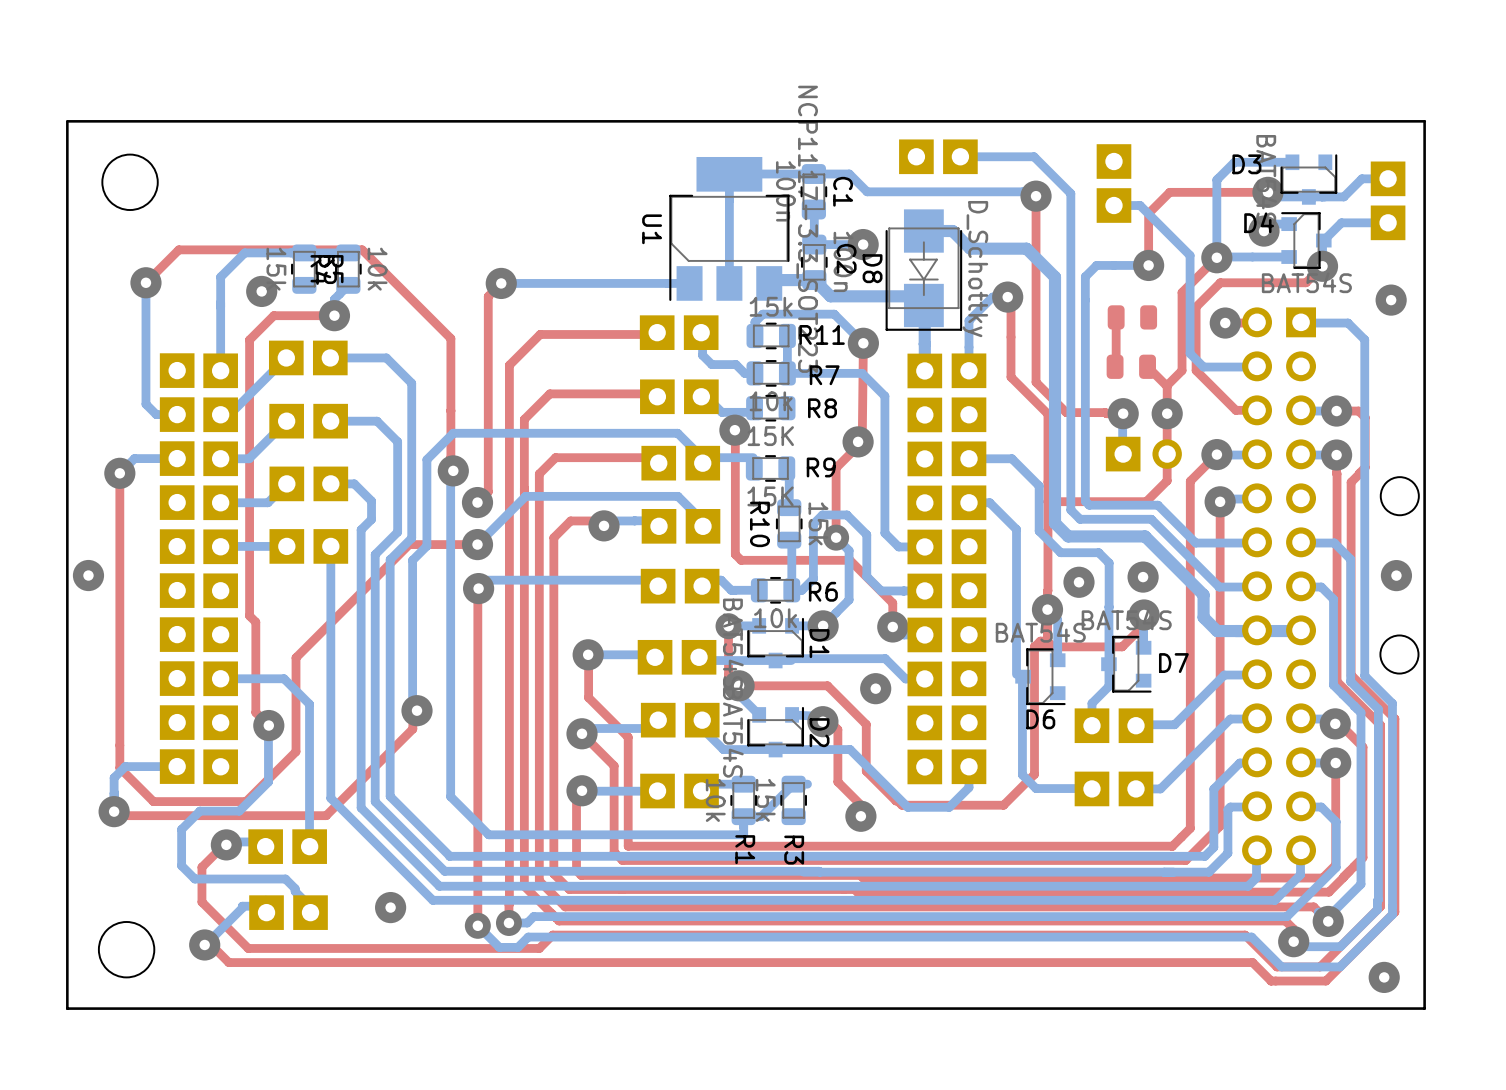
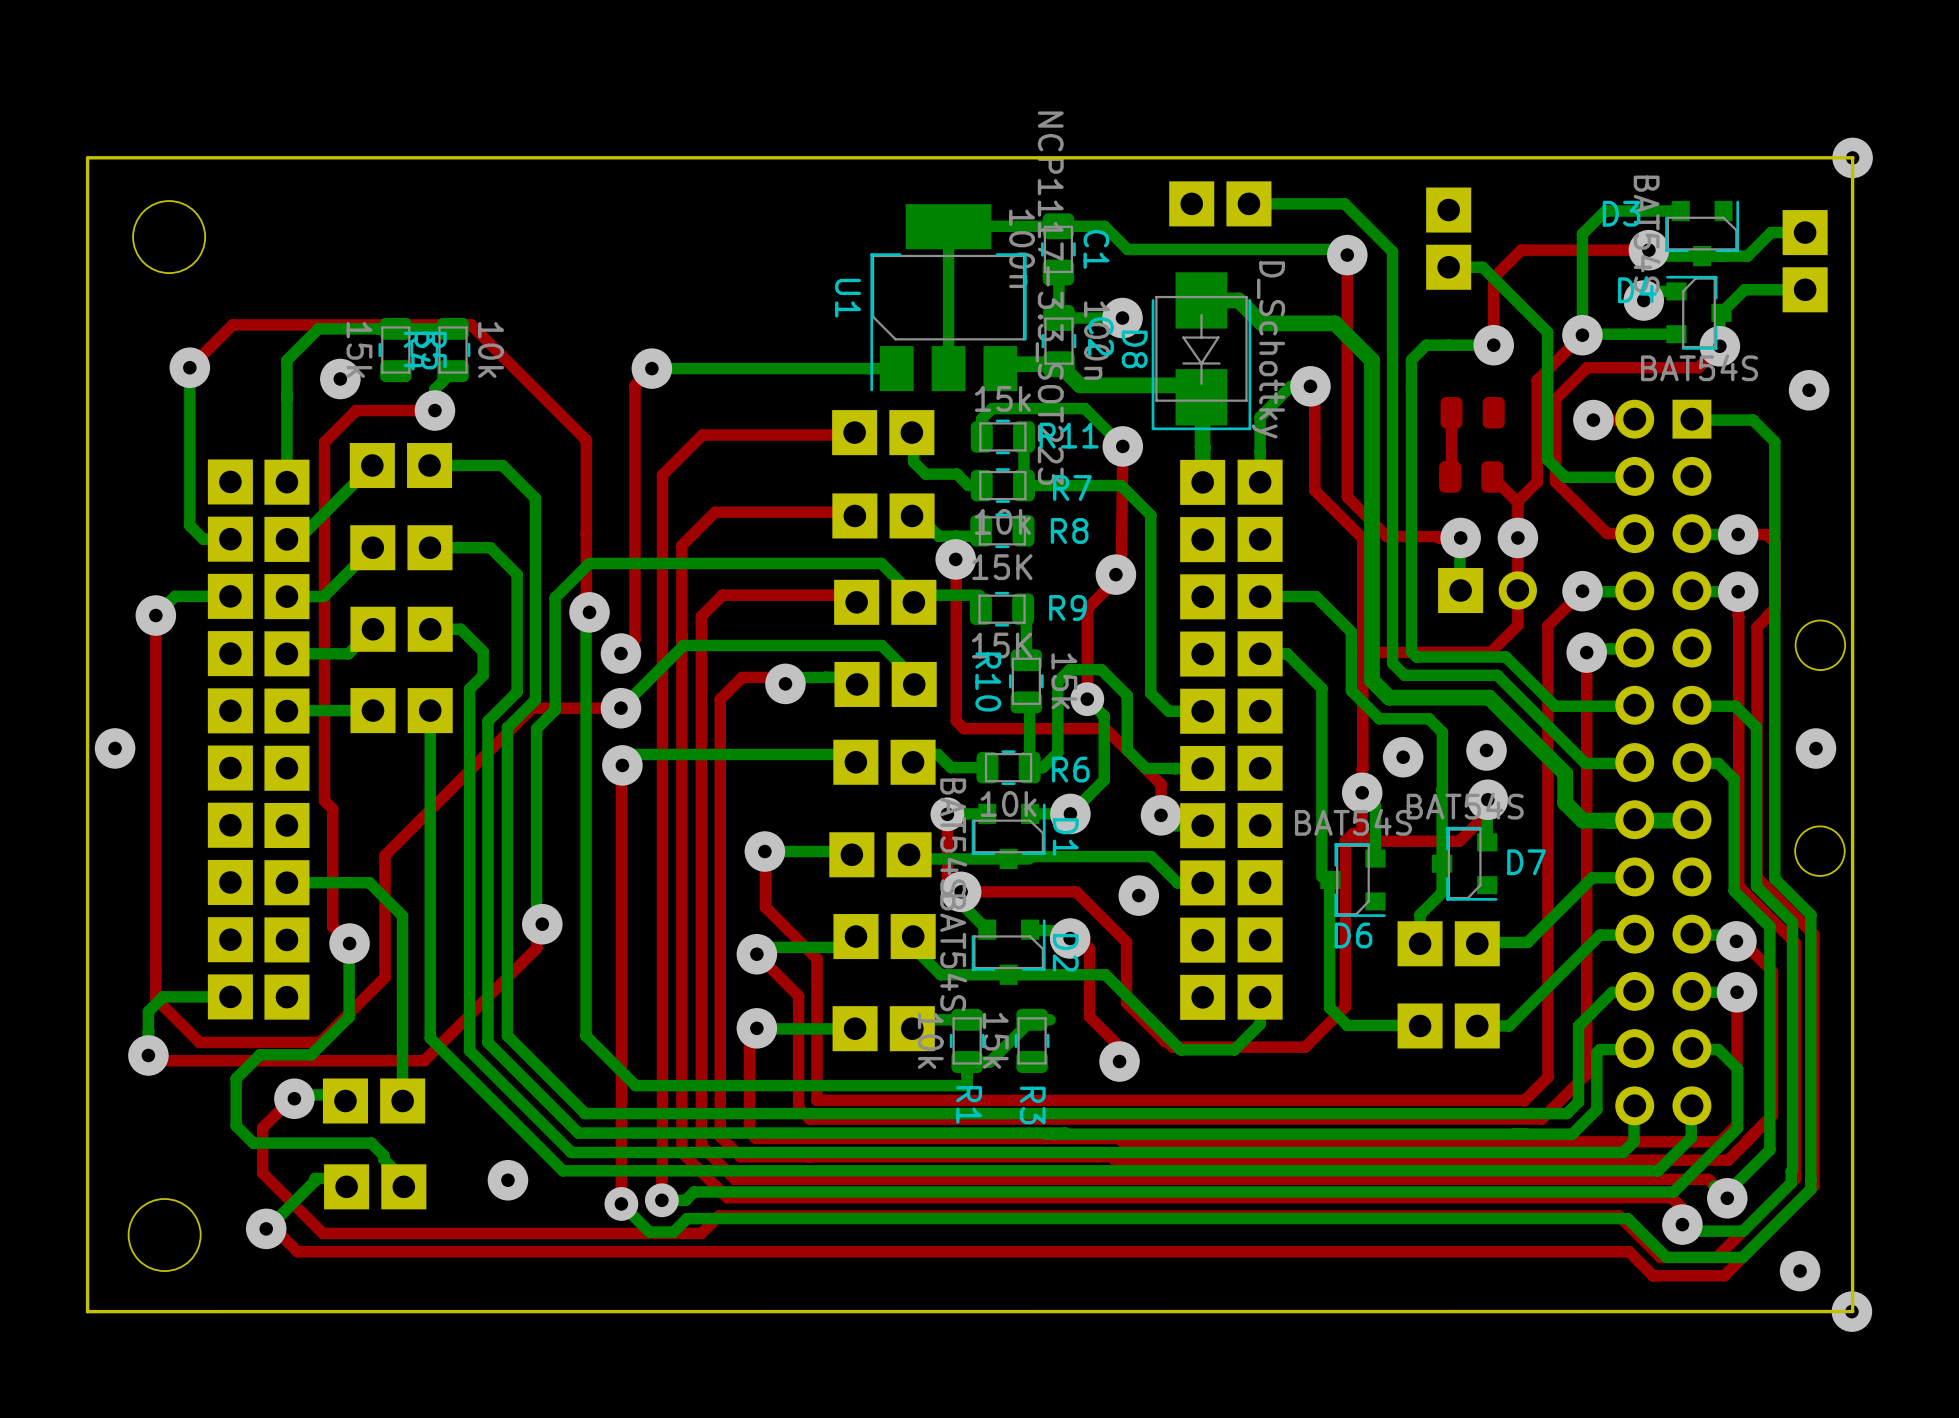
via: none -> (1852, 157)
via: none -> (1851, 1311)

